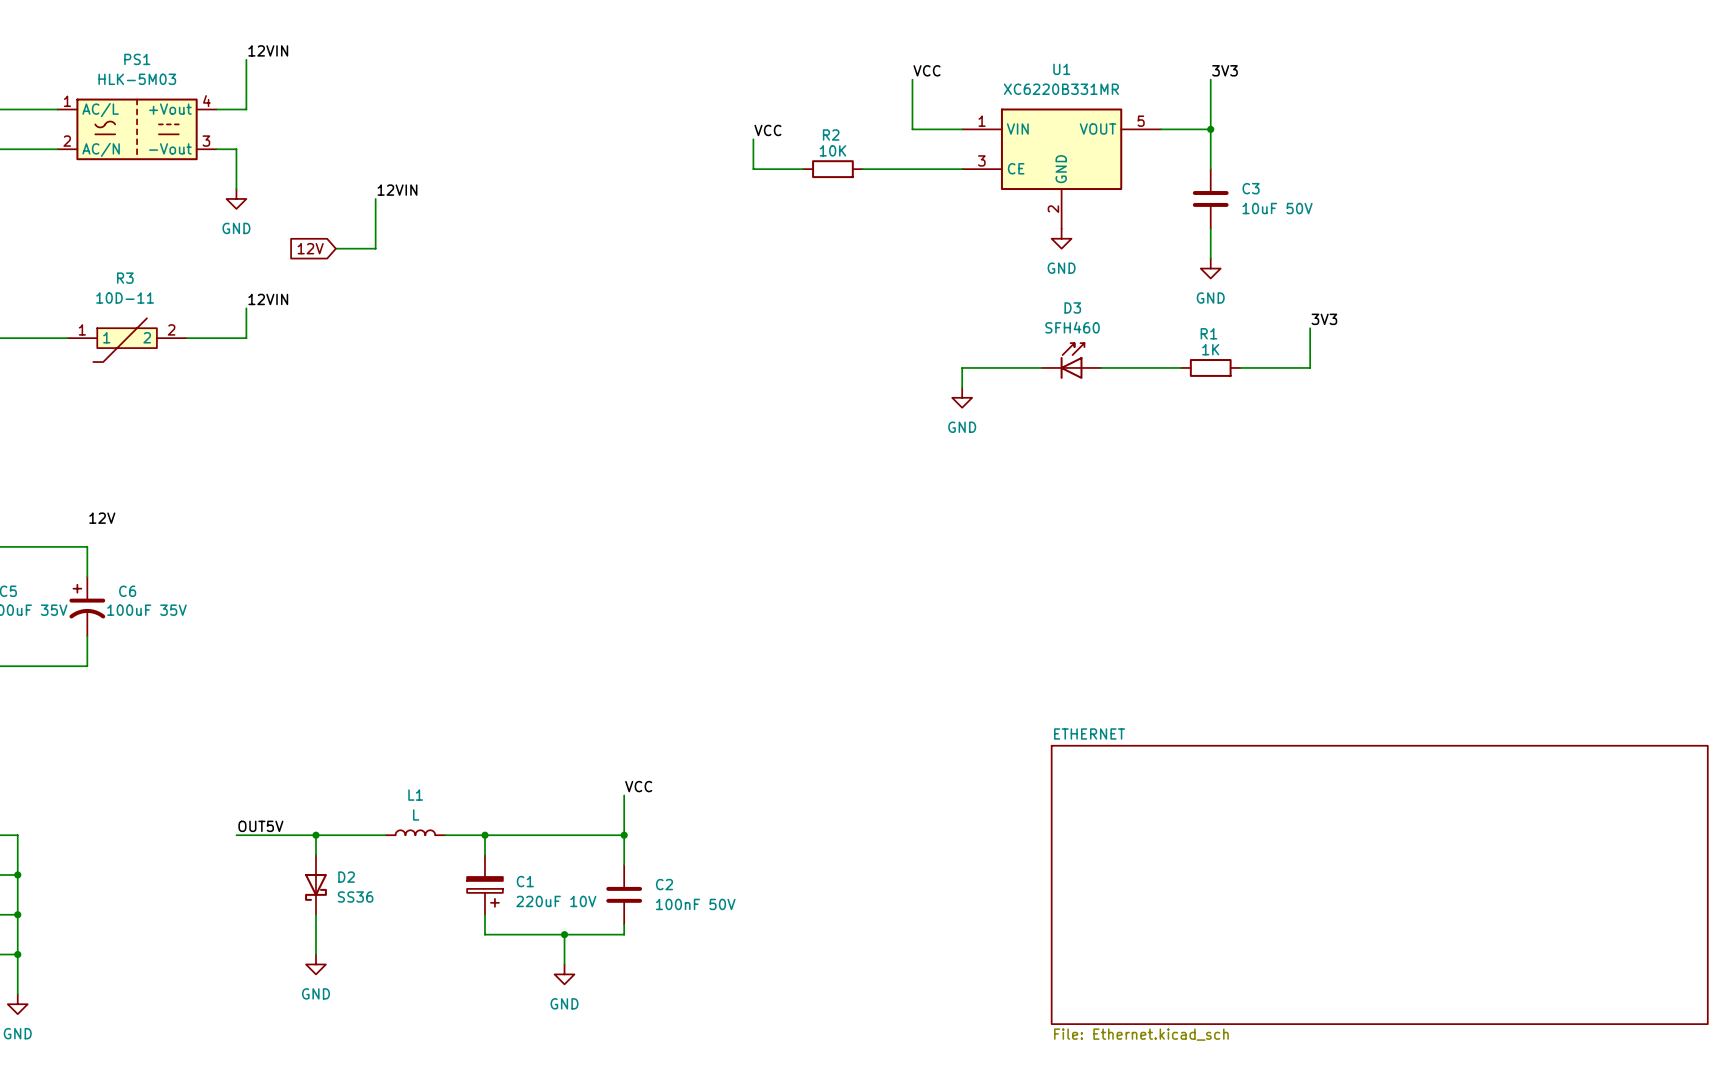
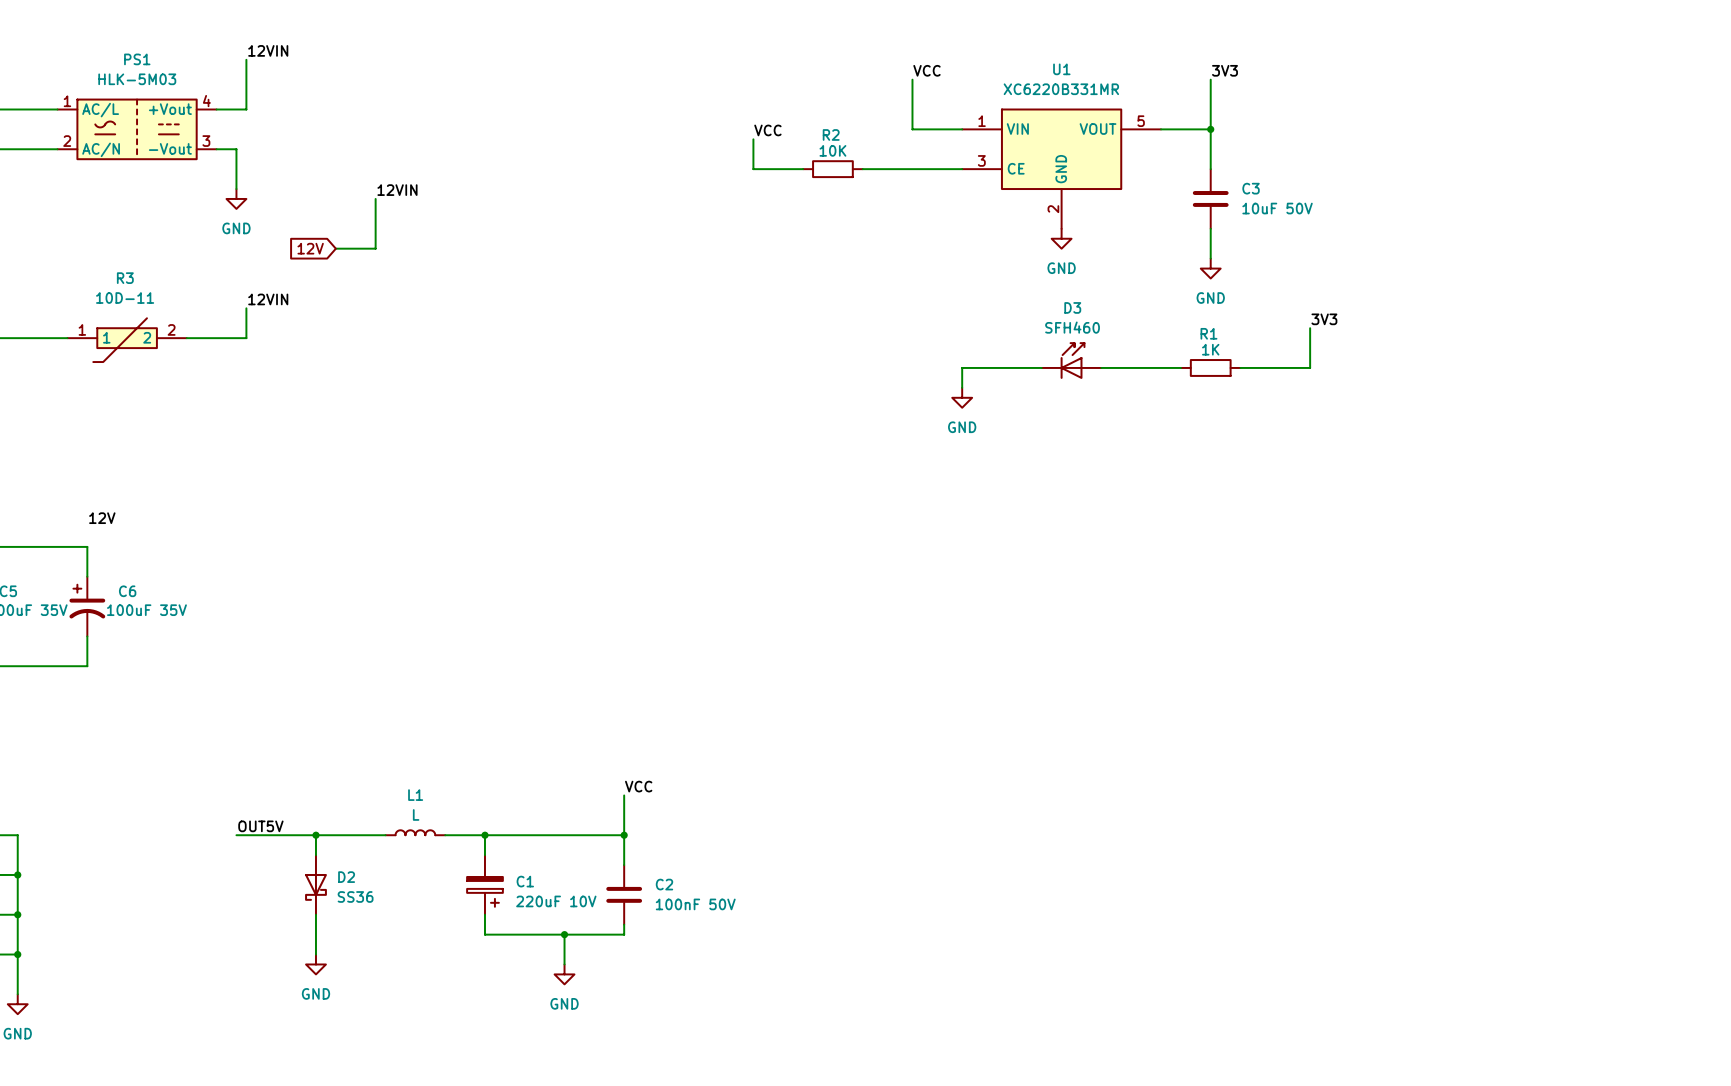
sheet ETHERNET: File: Ethernet.kicad_sch (1379, 884) -> none

